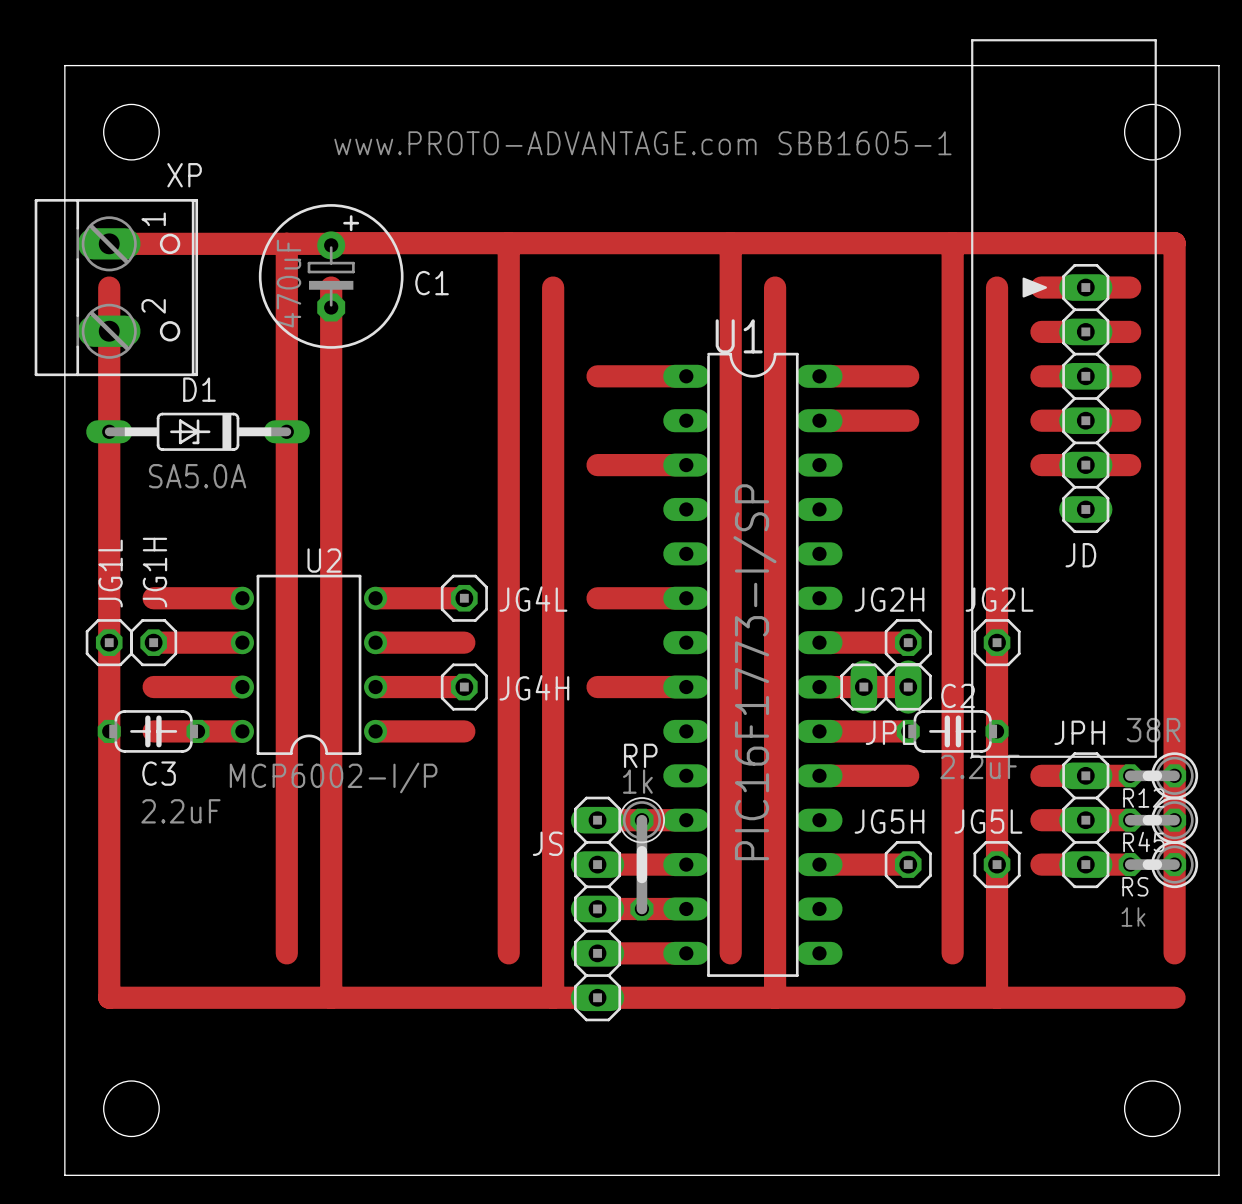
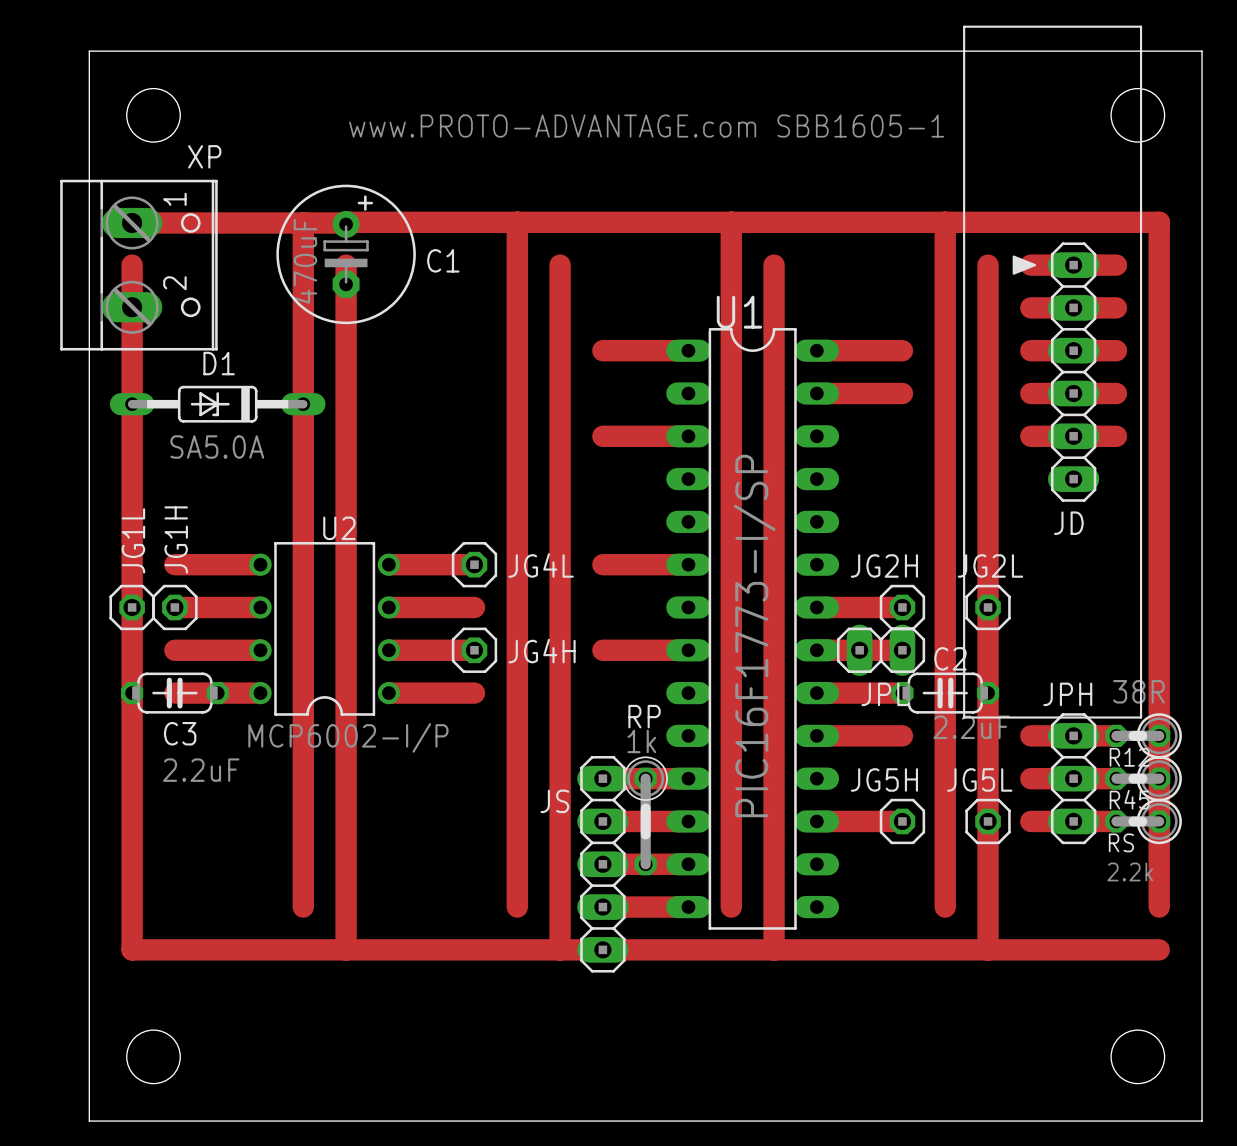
RS value: 1k (1133, 916) -> 2.2k (1130, 871)

